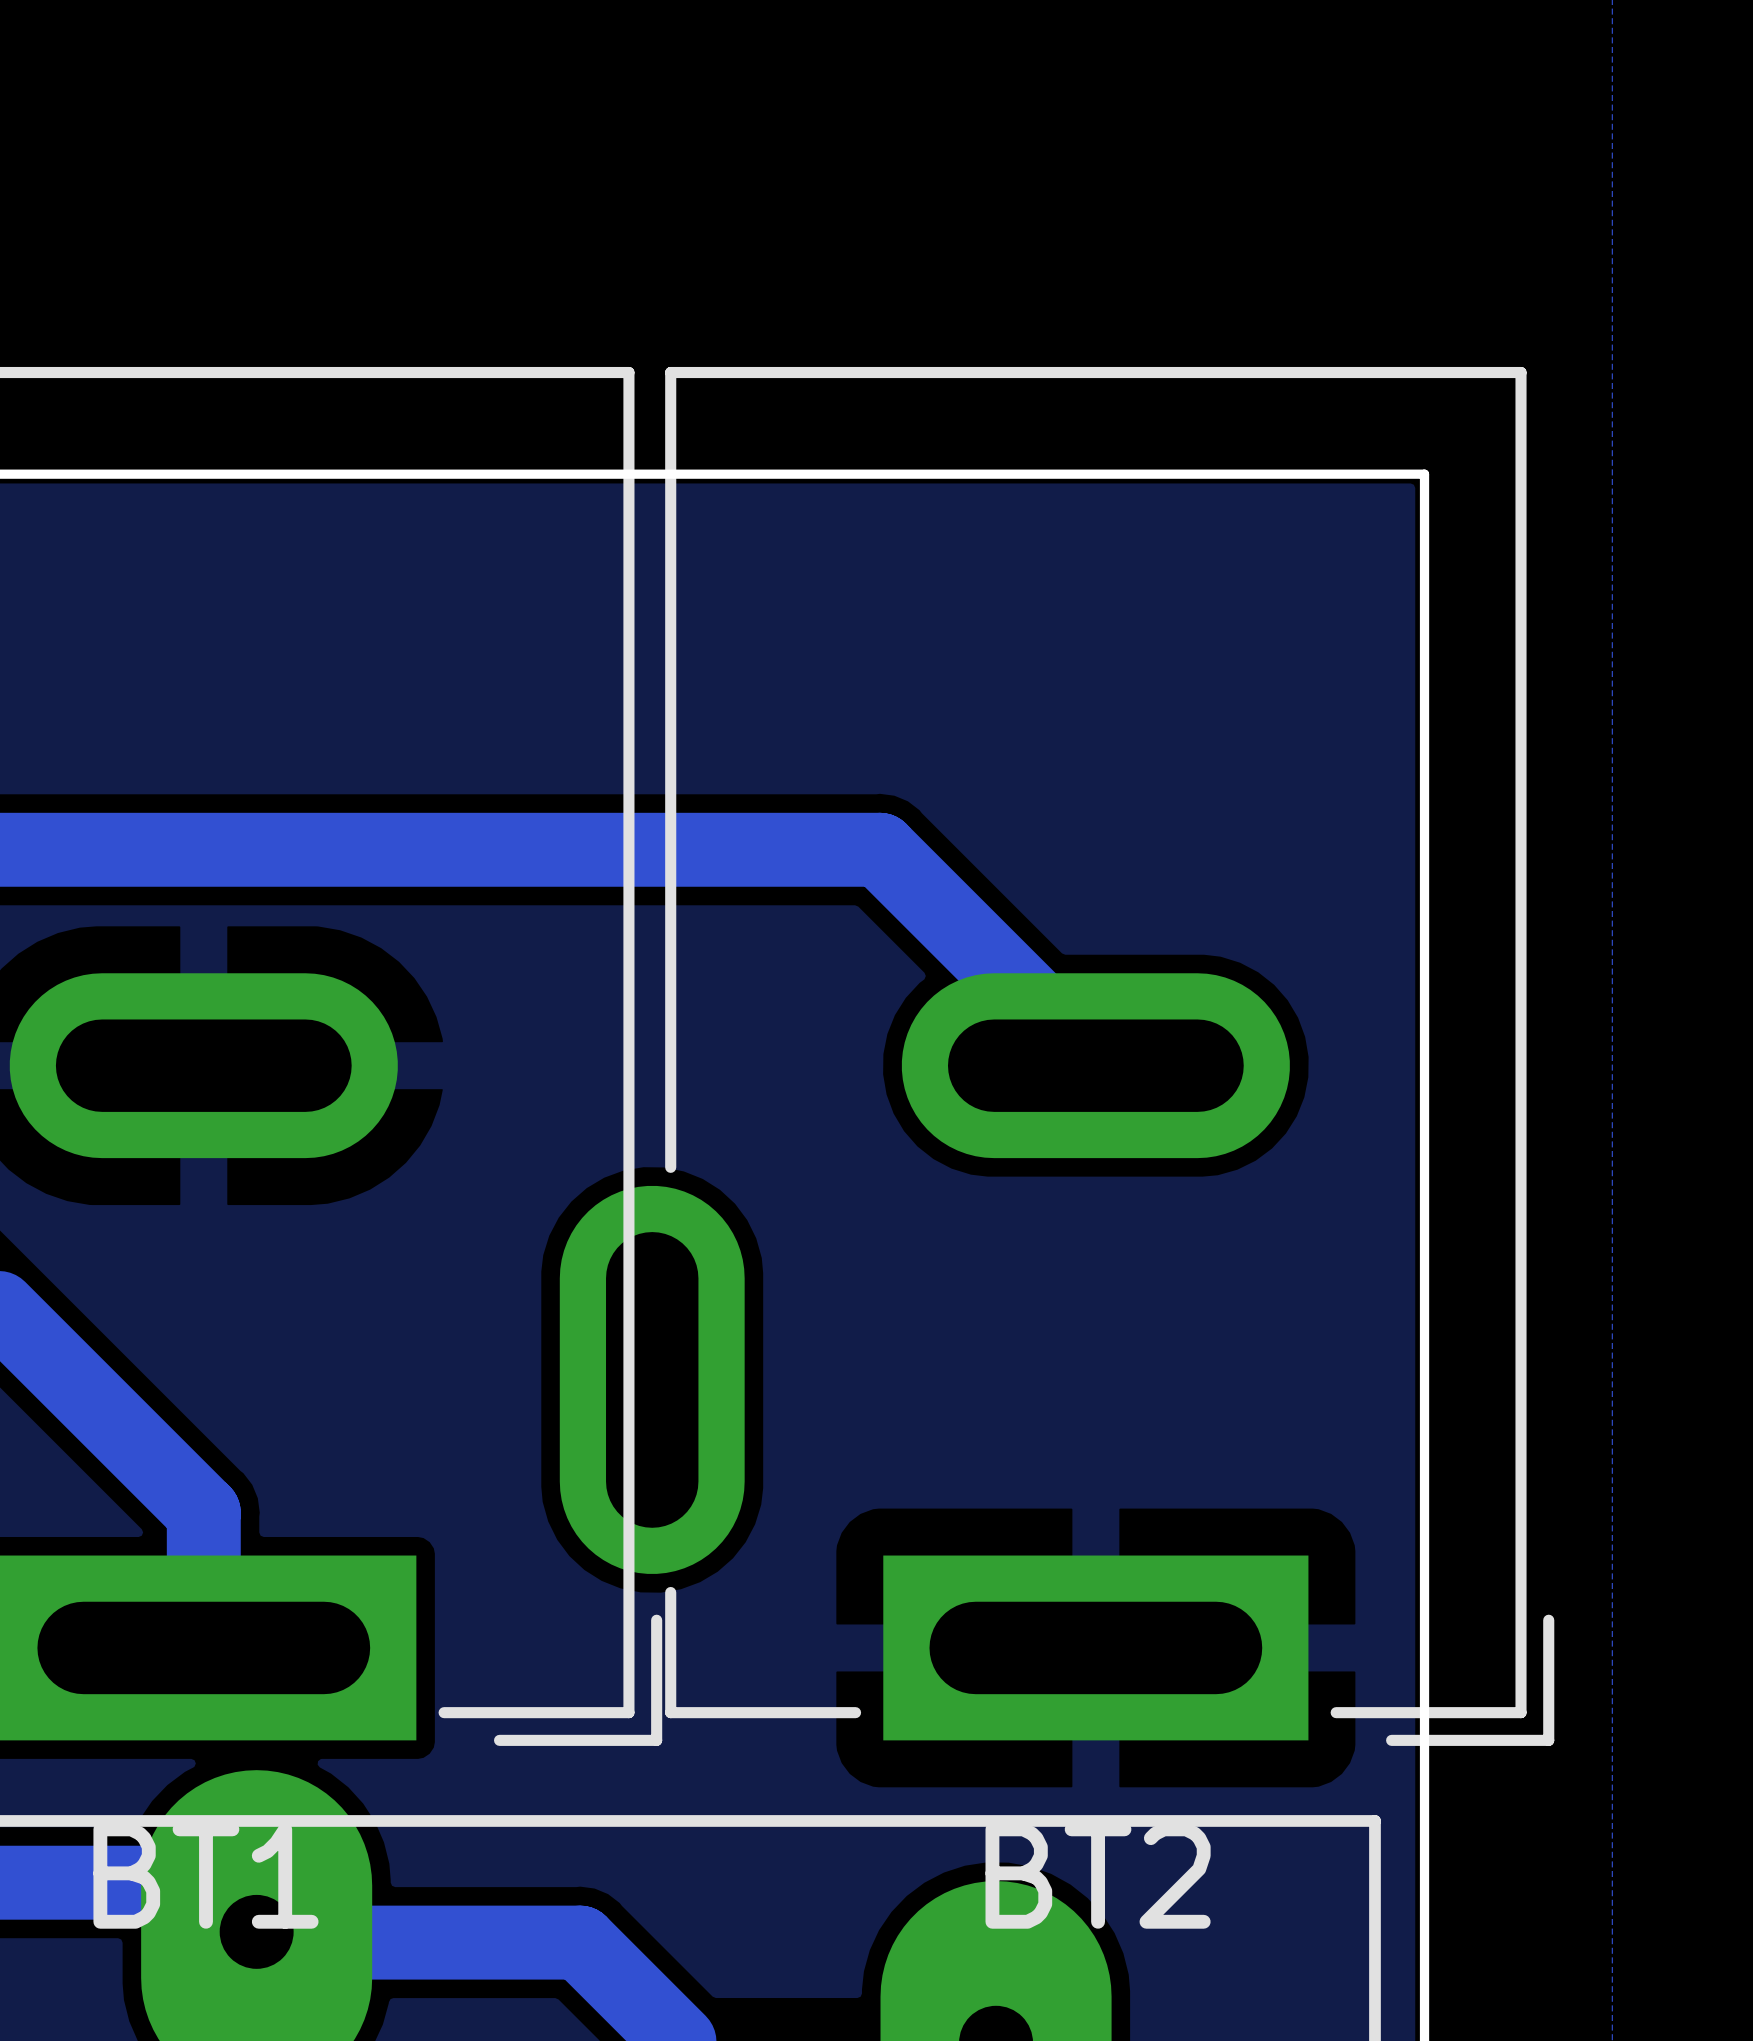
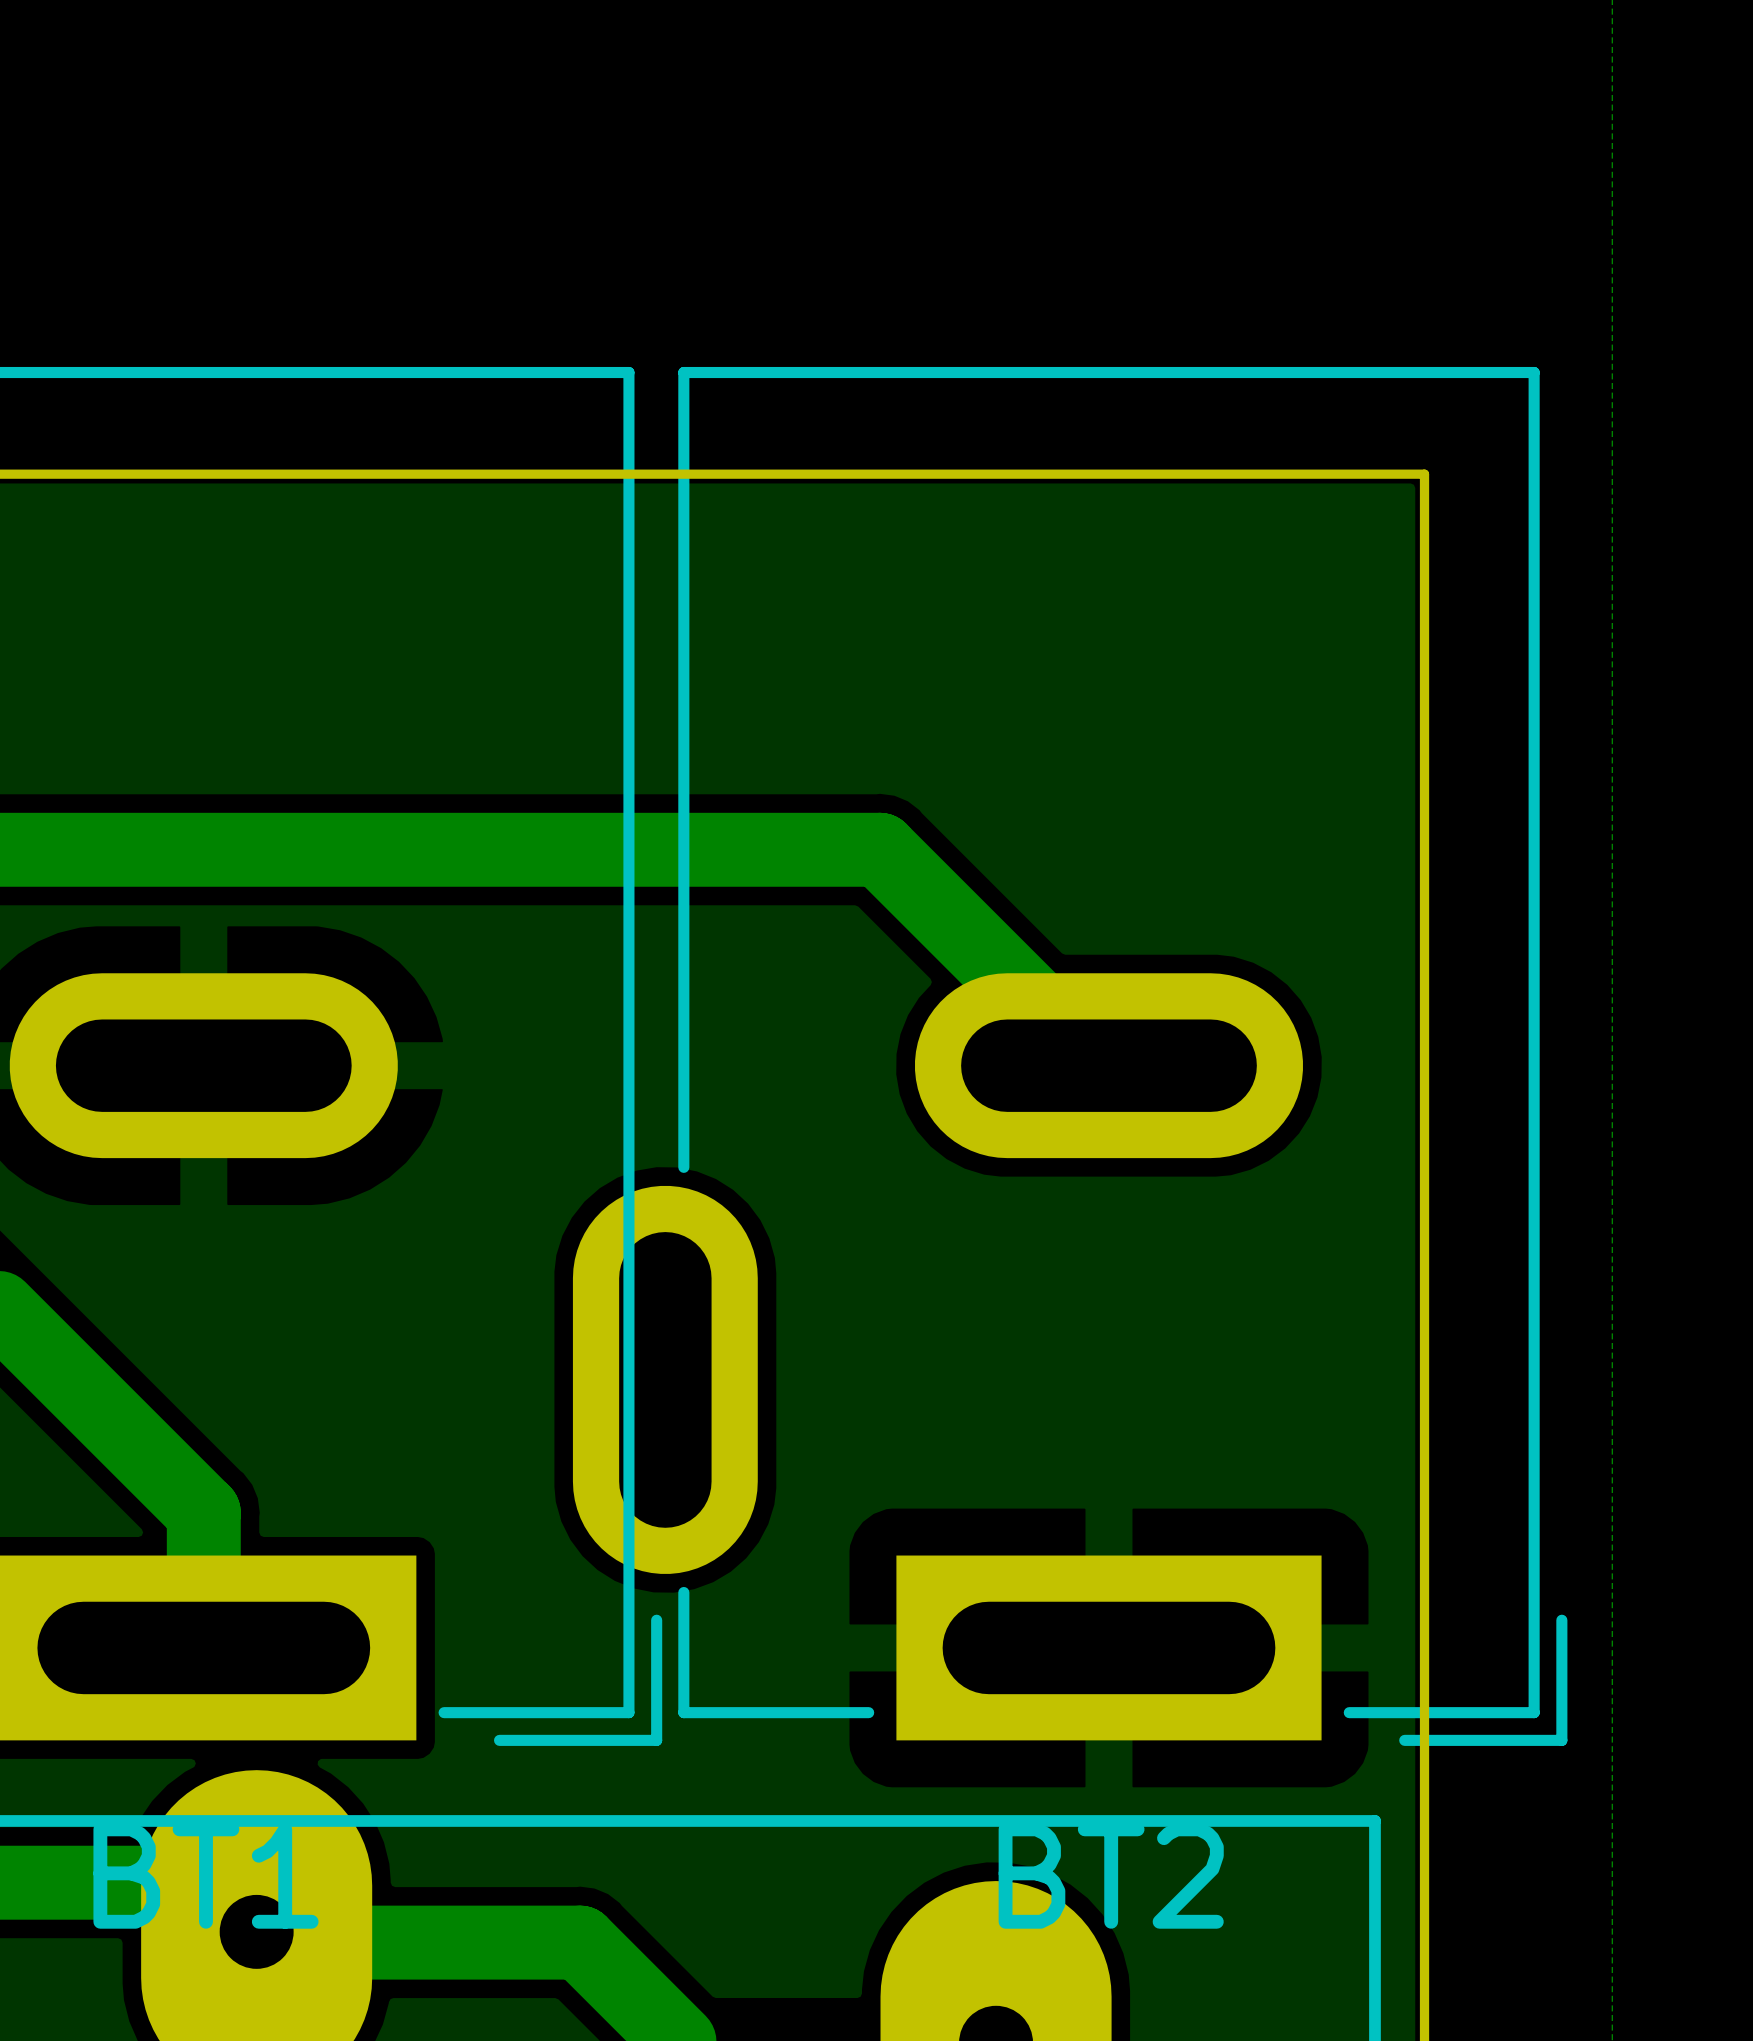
BT2 position: (1057, 1056) -> (1070, 1056)

